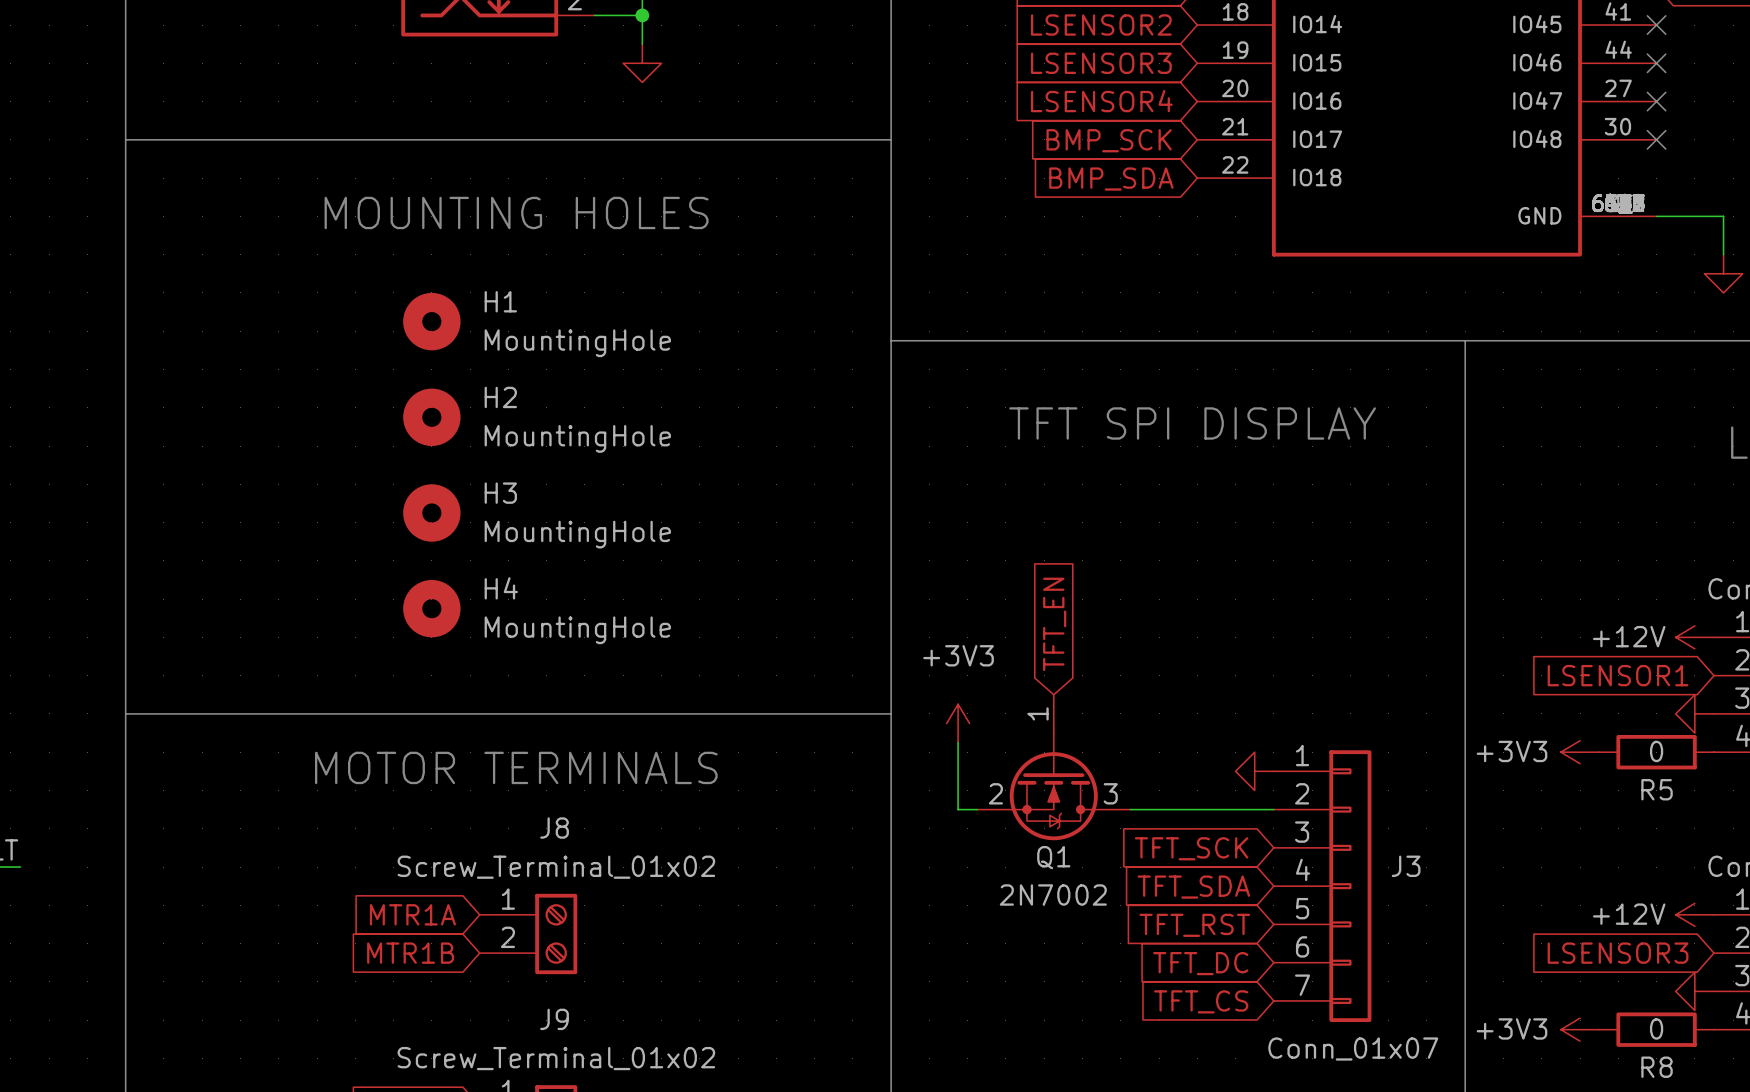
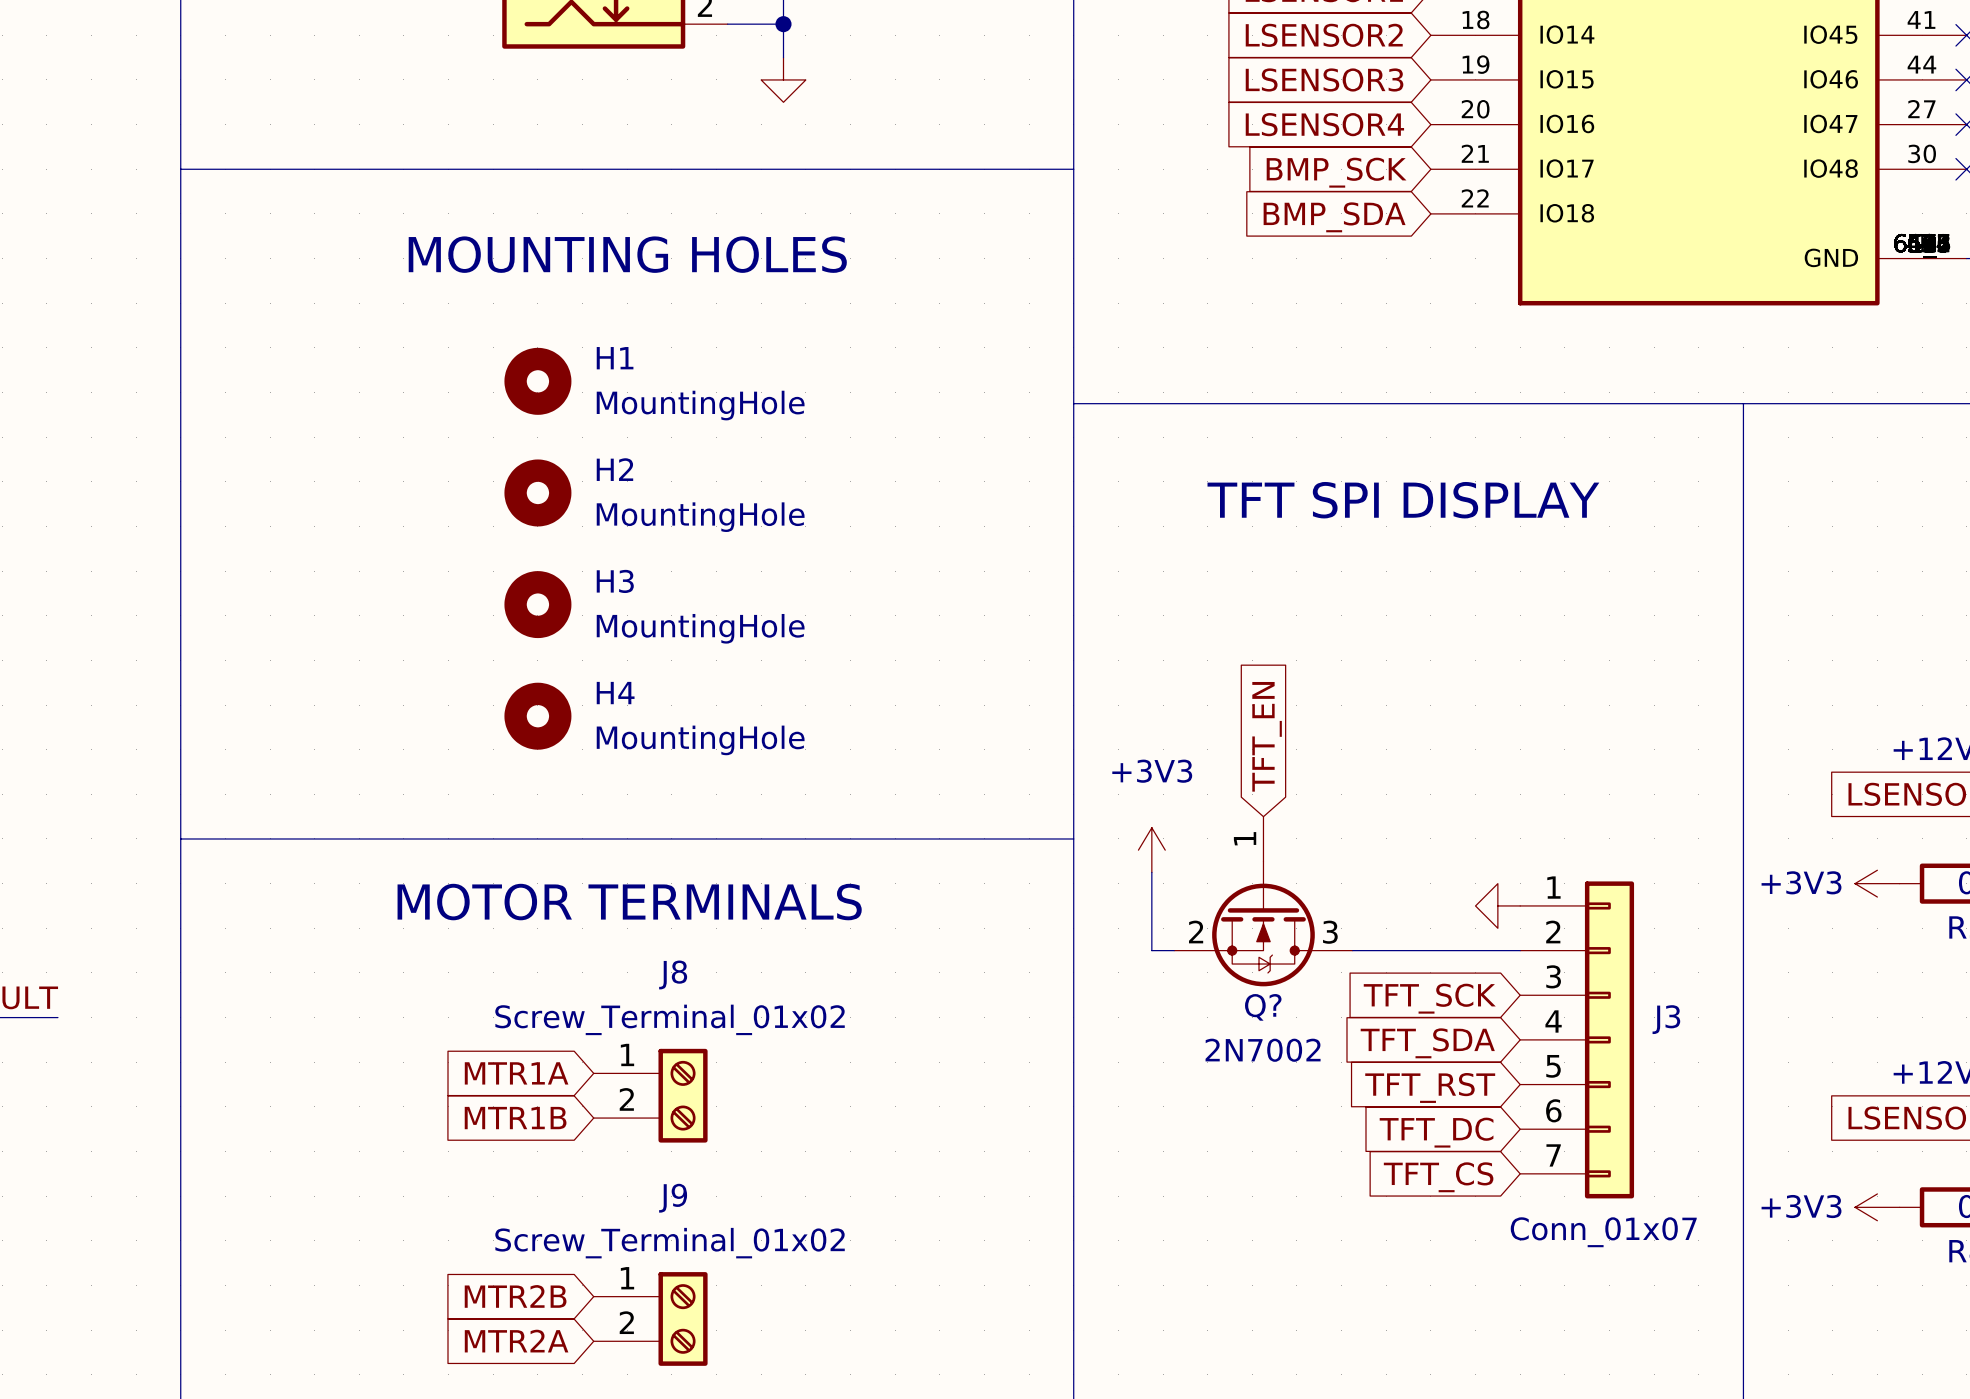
Q1 name: Q1 (1053, 857) -> Q? (1263, 1007)

